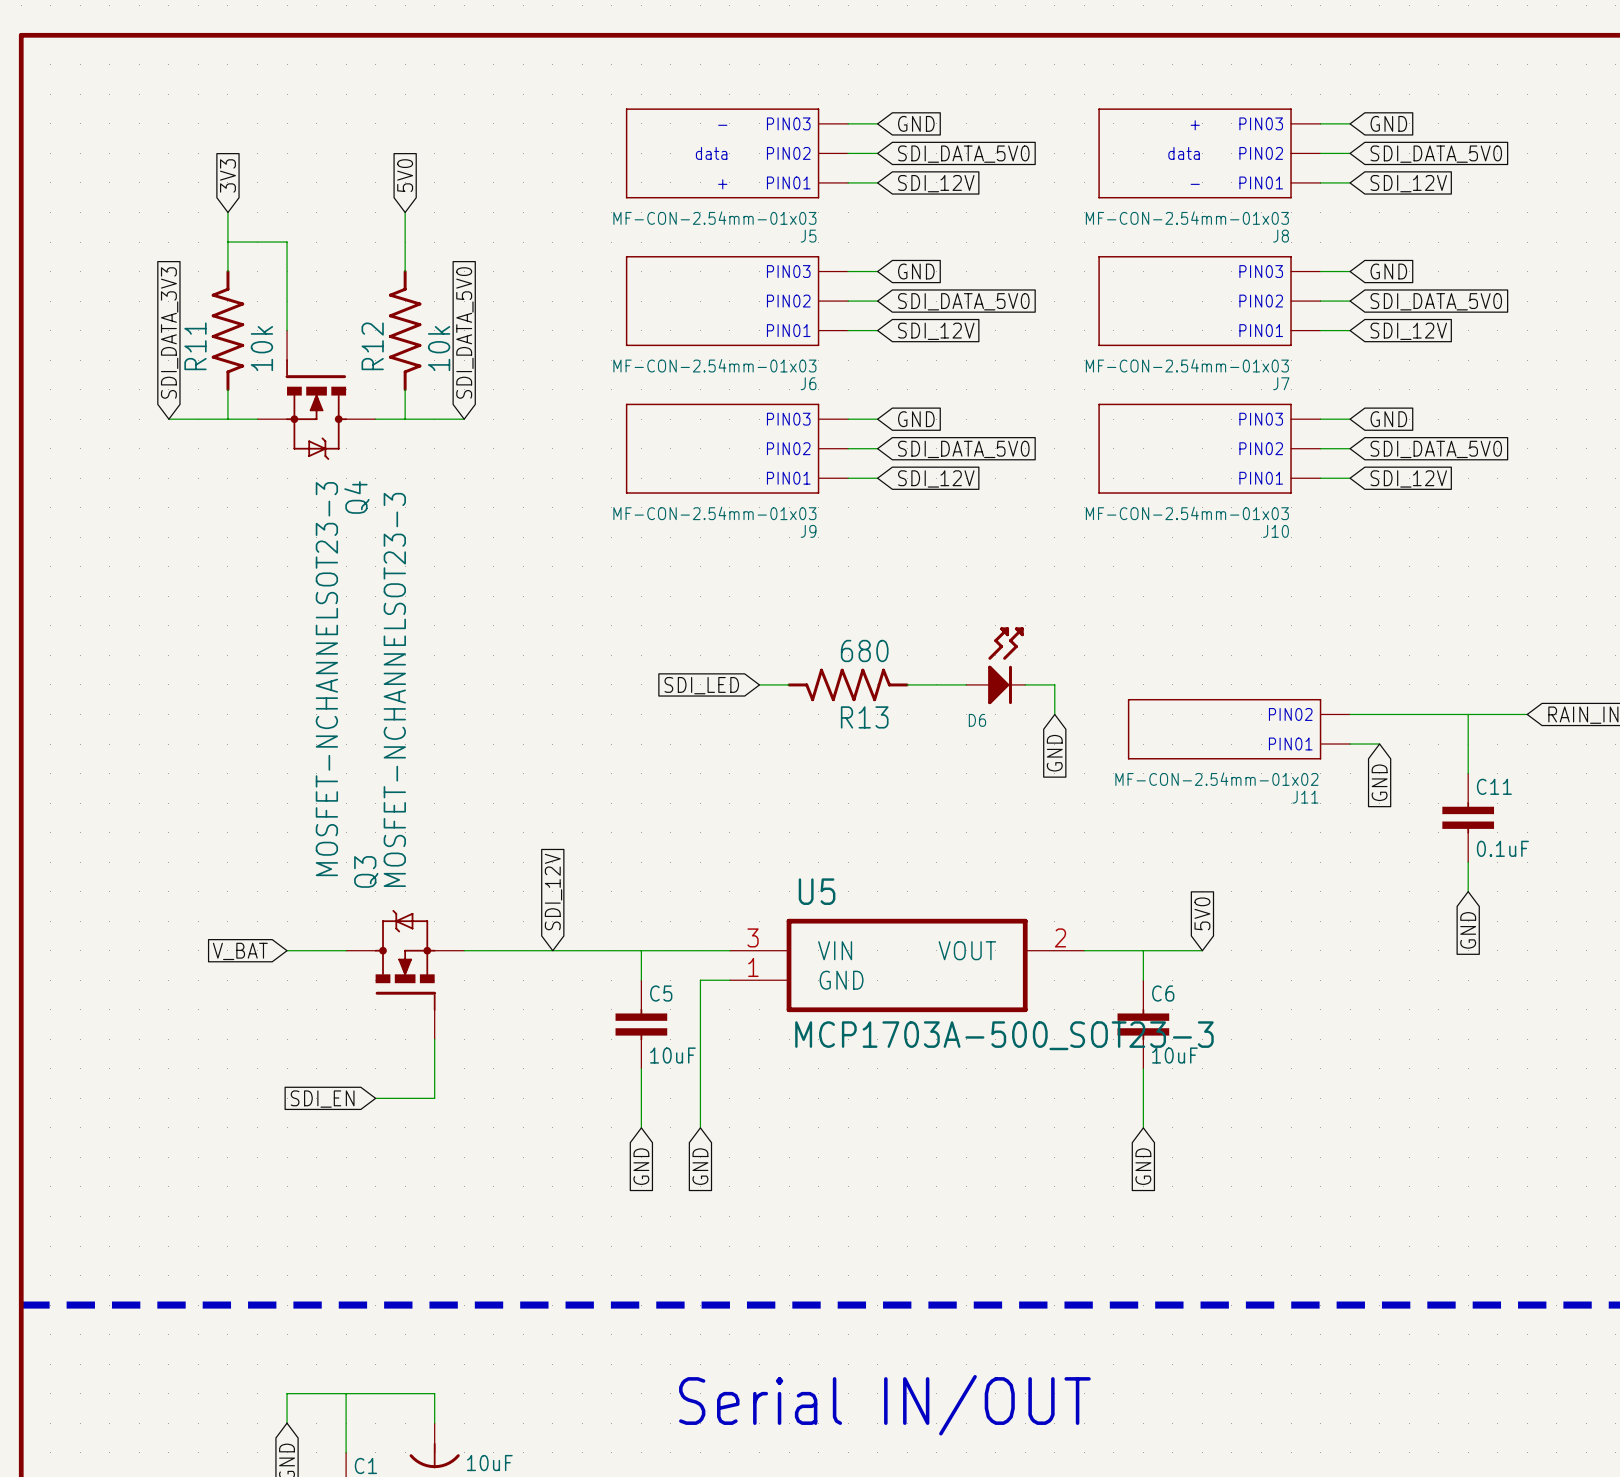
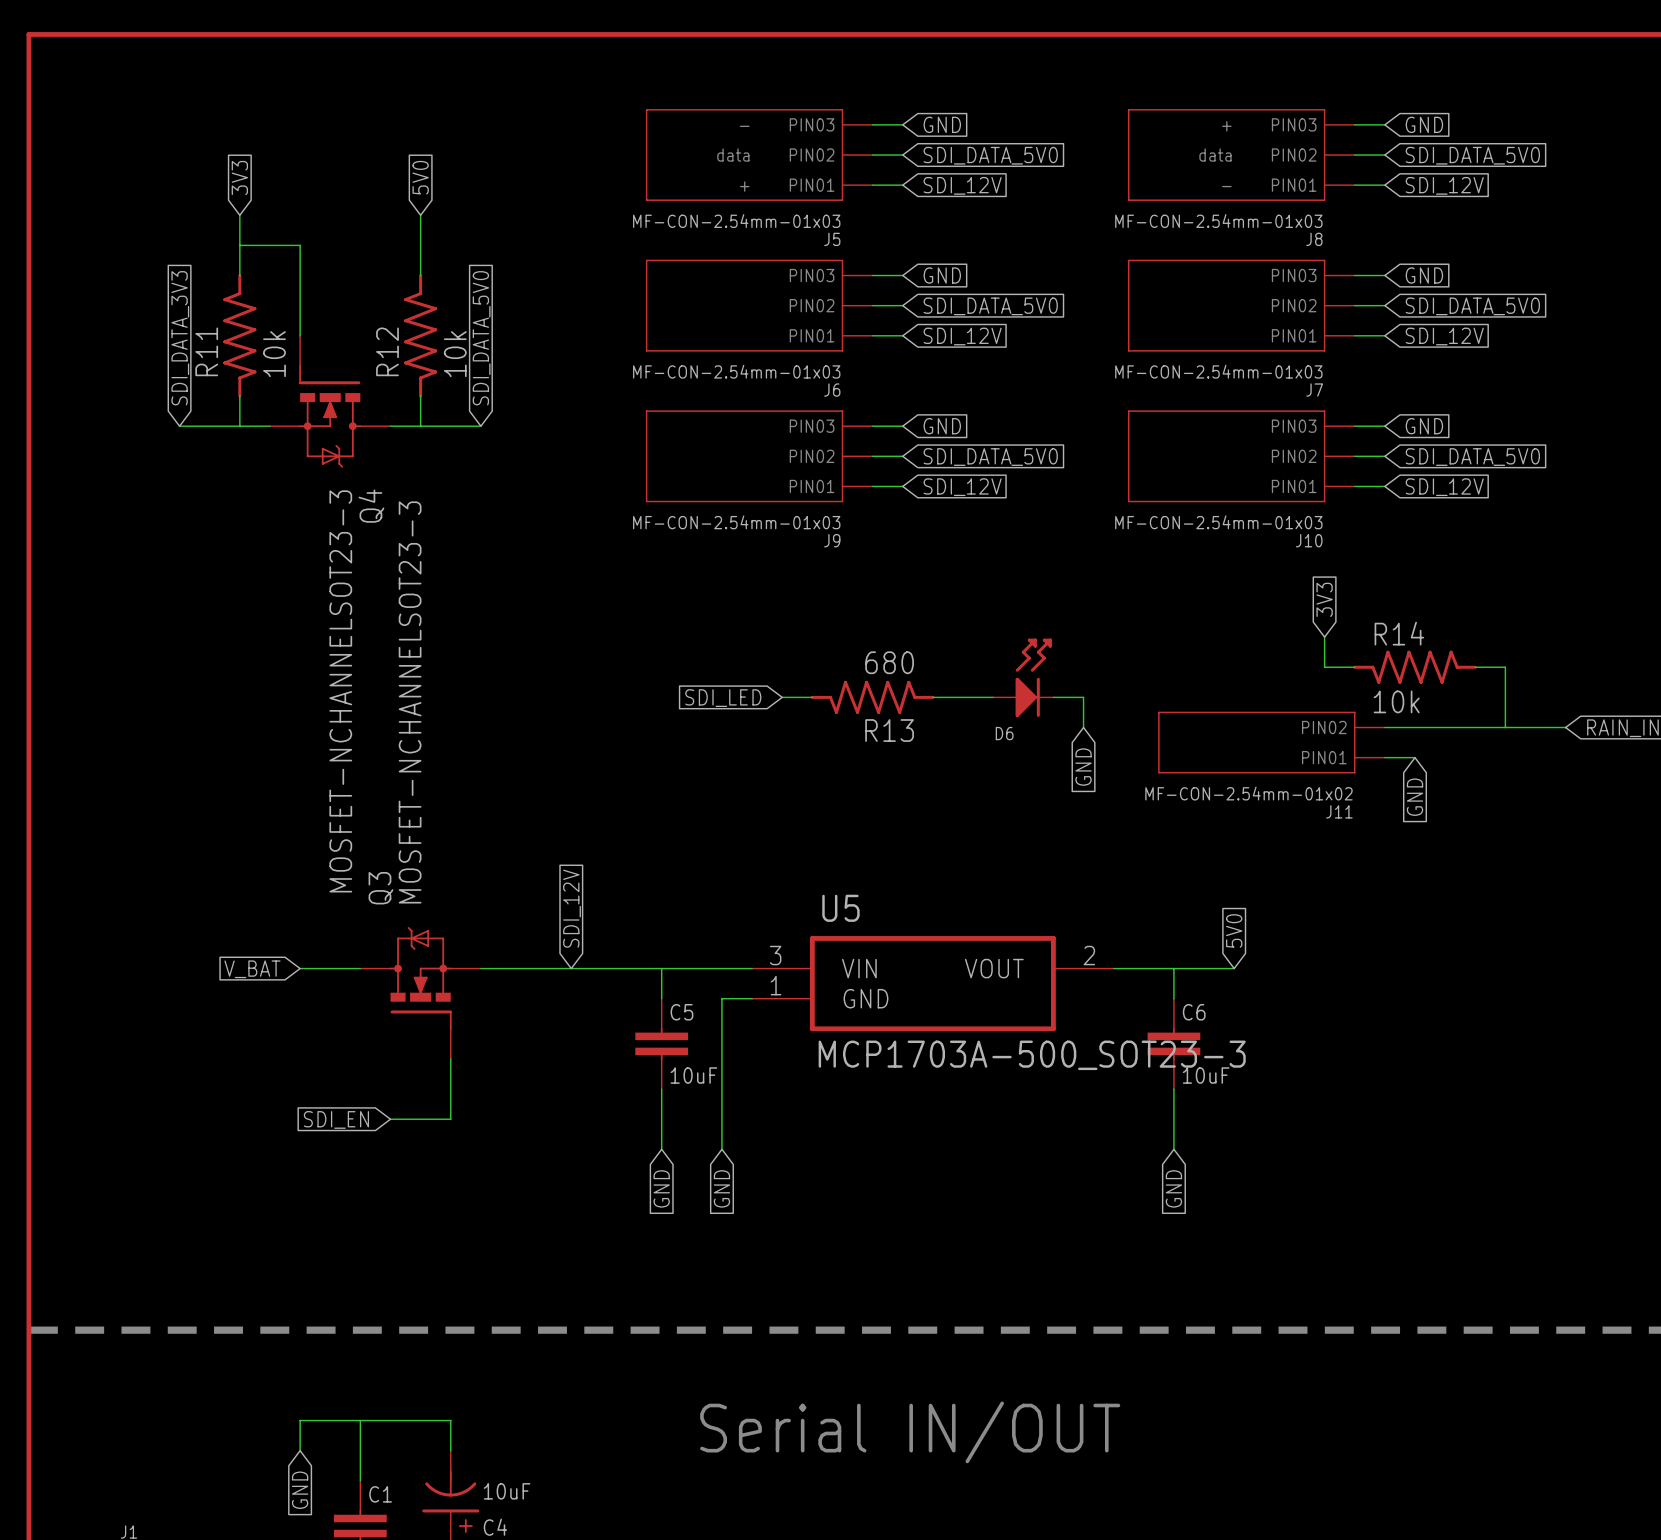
global label: none -> 3V3 (1324, 599)
wire: none -> (1324, 637) (1324, 667) (1354, 667)
R14: none -> 10k (1414, 667)
wire: (1468, 714) (1468, 773) -> (1505, 727) (1505, 667) (1475, 667)
C11: 0.1uF (1468, 817) -> none
wire: (1468, 862) (1468, 891) -> none
global label: GND (1468, 930) -> none

